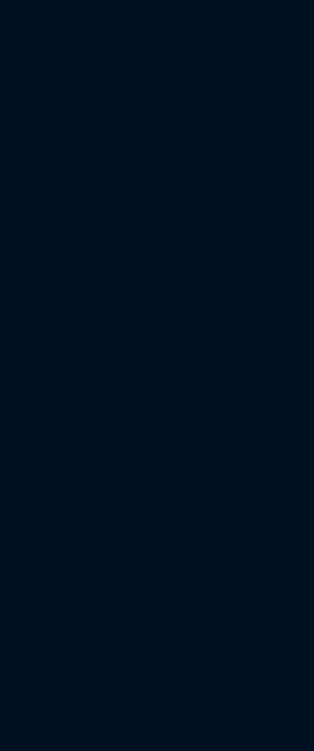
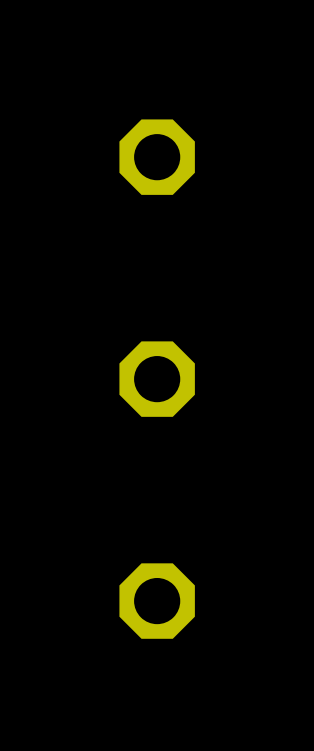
part: none -> (157, 157)
part: none -> (157, 379)
part: none -> (157, 601)

